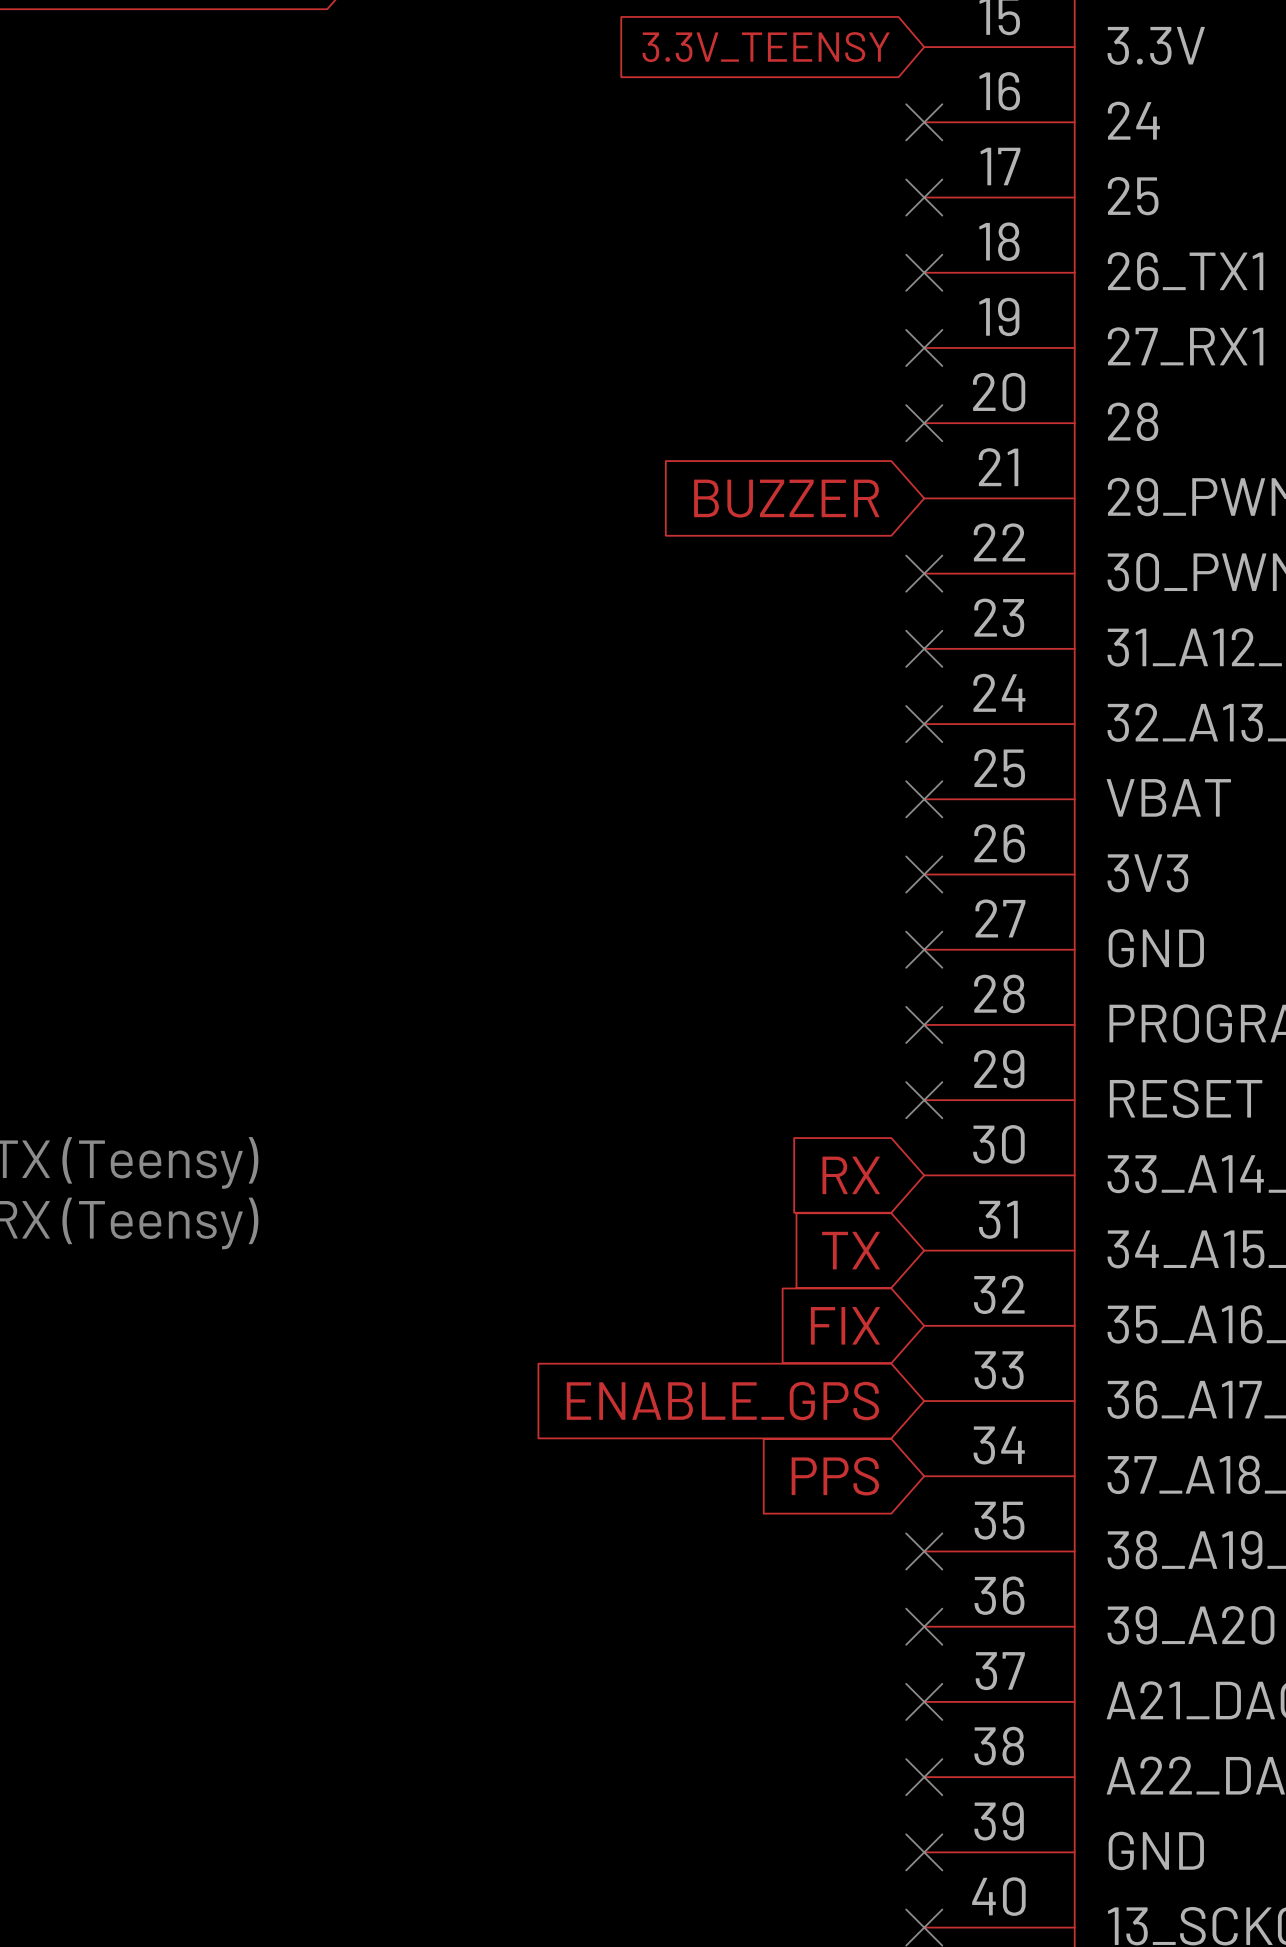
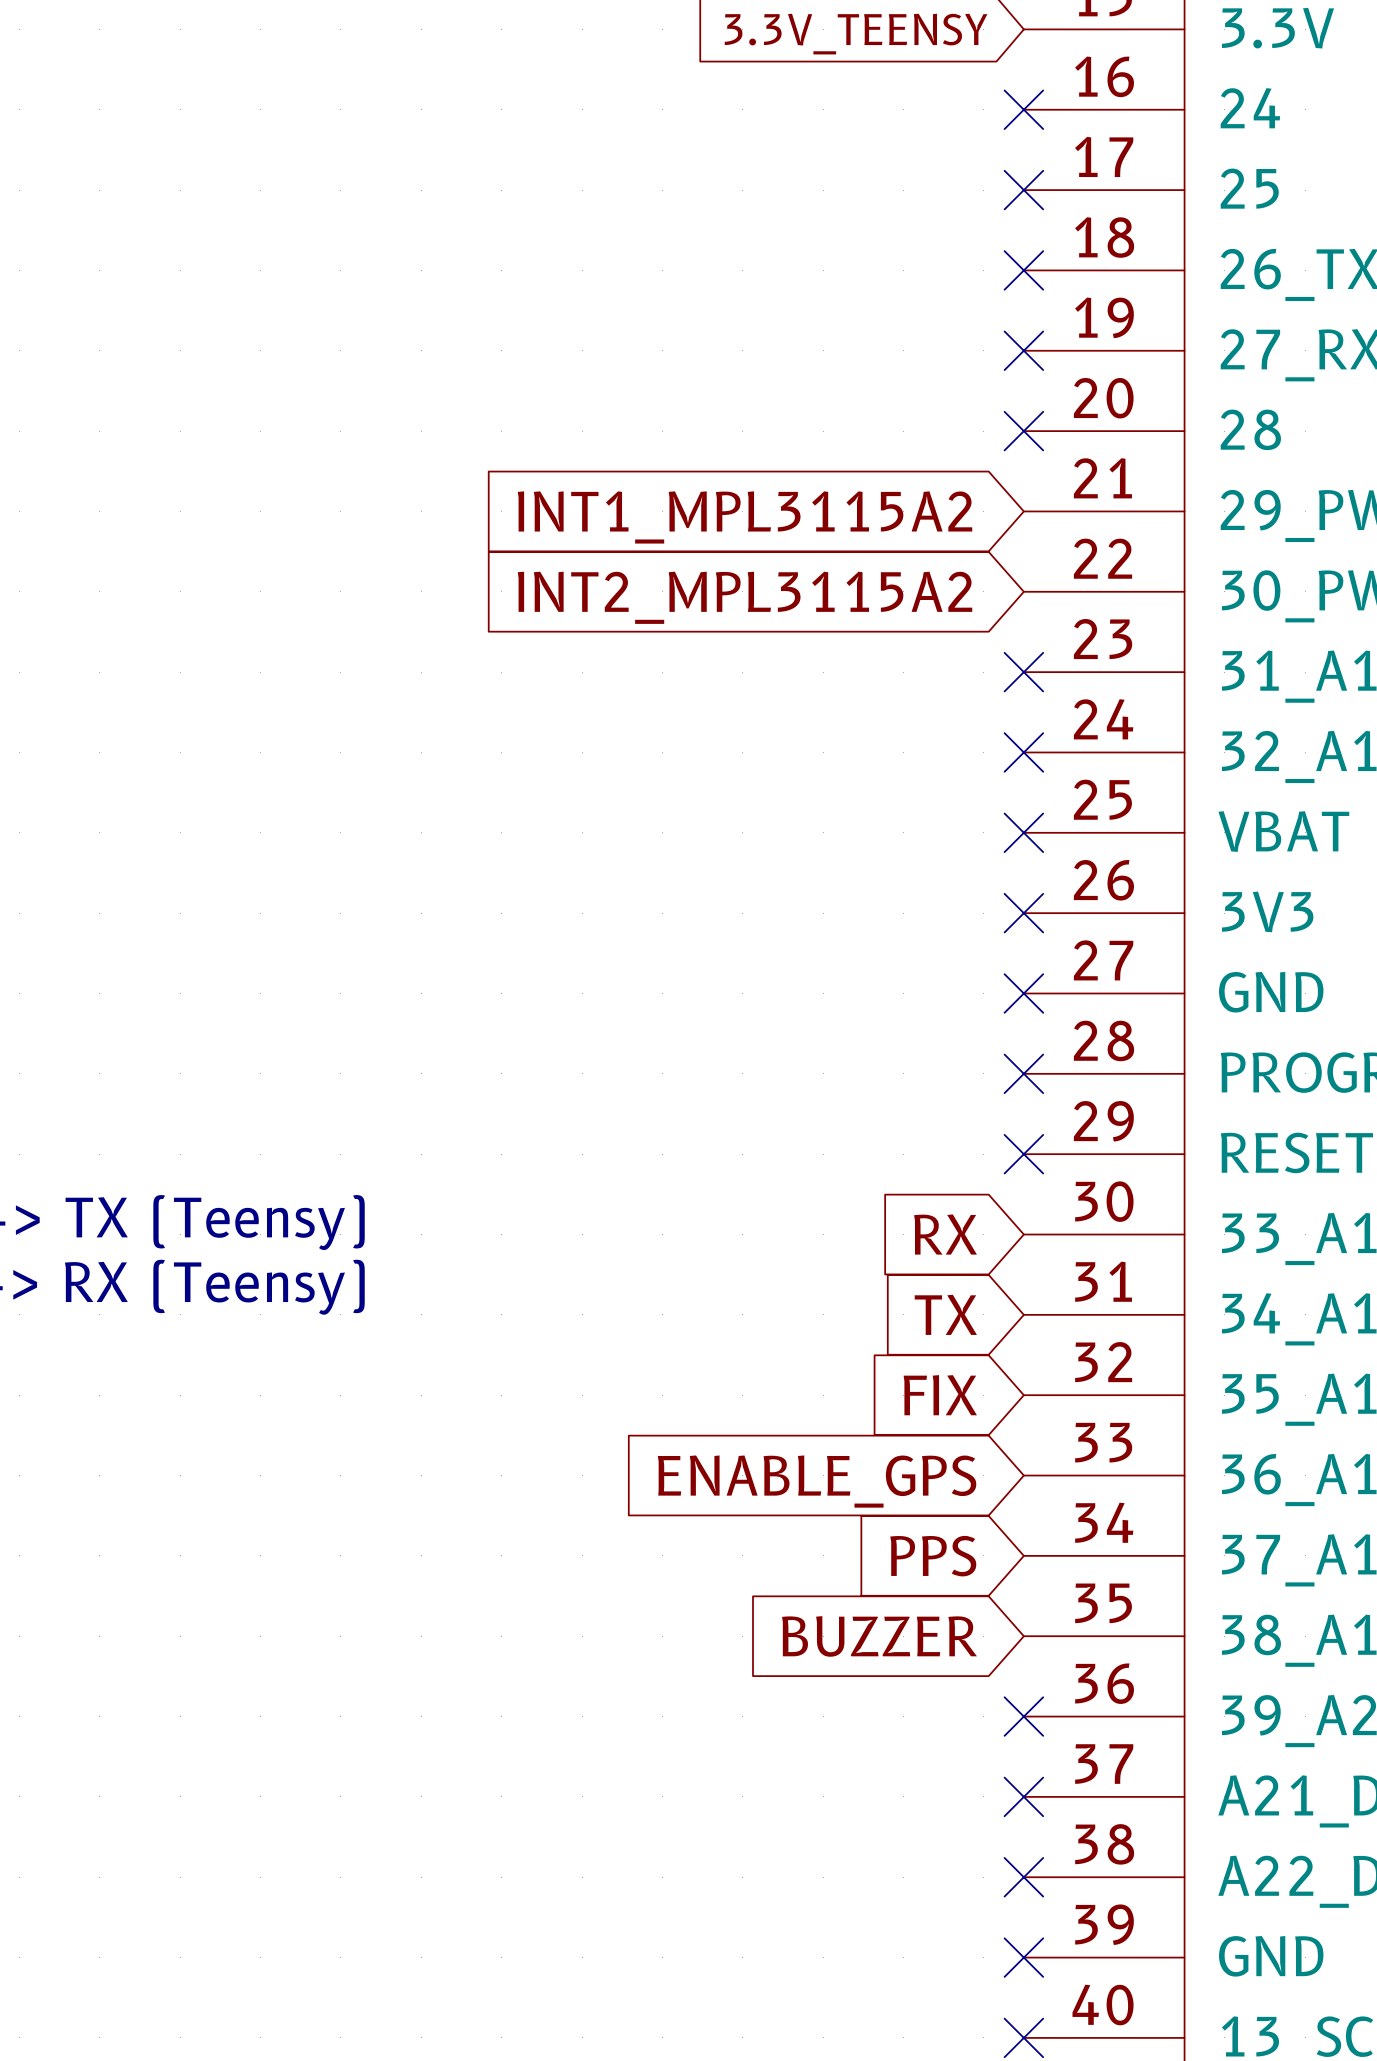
global label: BUZZER (786, 498) -> INT1_MPL3115A2 (745, 517)
global label: none -> INT2_MPL3115A2 (745, 597)
no-connect mark: (924, 573) -> none
global label: none -> BUZZER (879, 1636)
no-connect mark: (924, 1551) -> none

